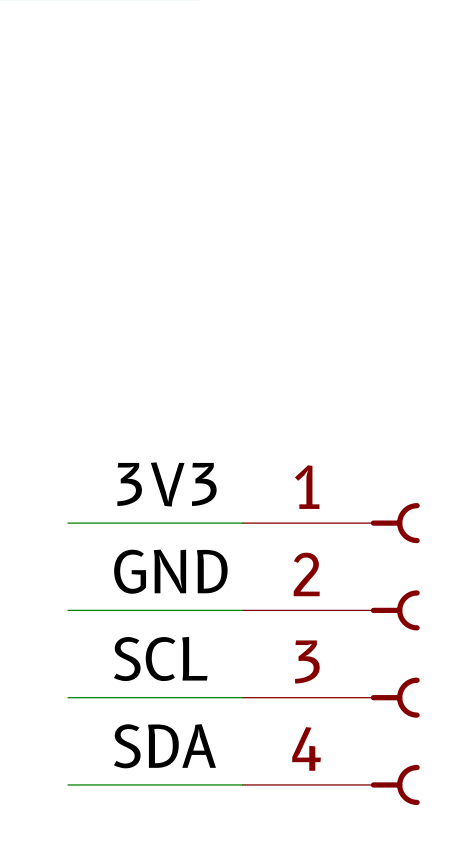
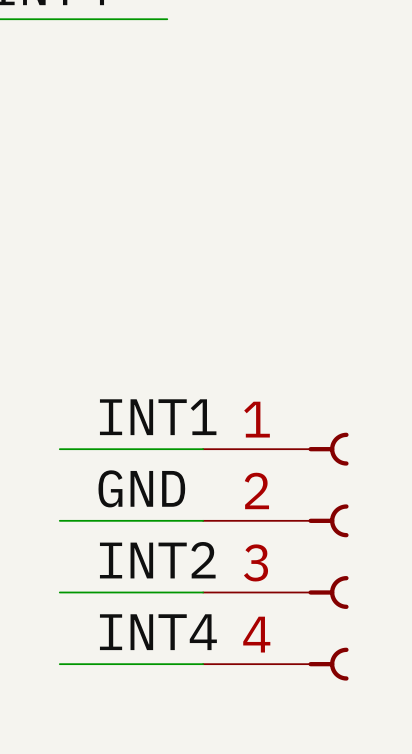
label: 3V3 (166, 484) -> INT1 (158, 417)
label: SCL (160, 658) -> INT2 (157, 560)
label: SDA (164, 746) -> INT4 (158, 632)

